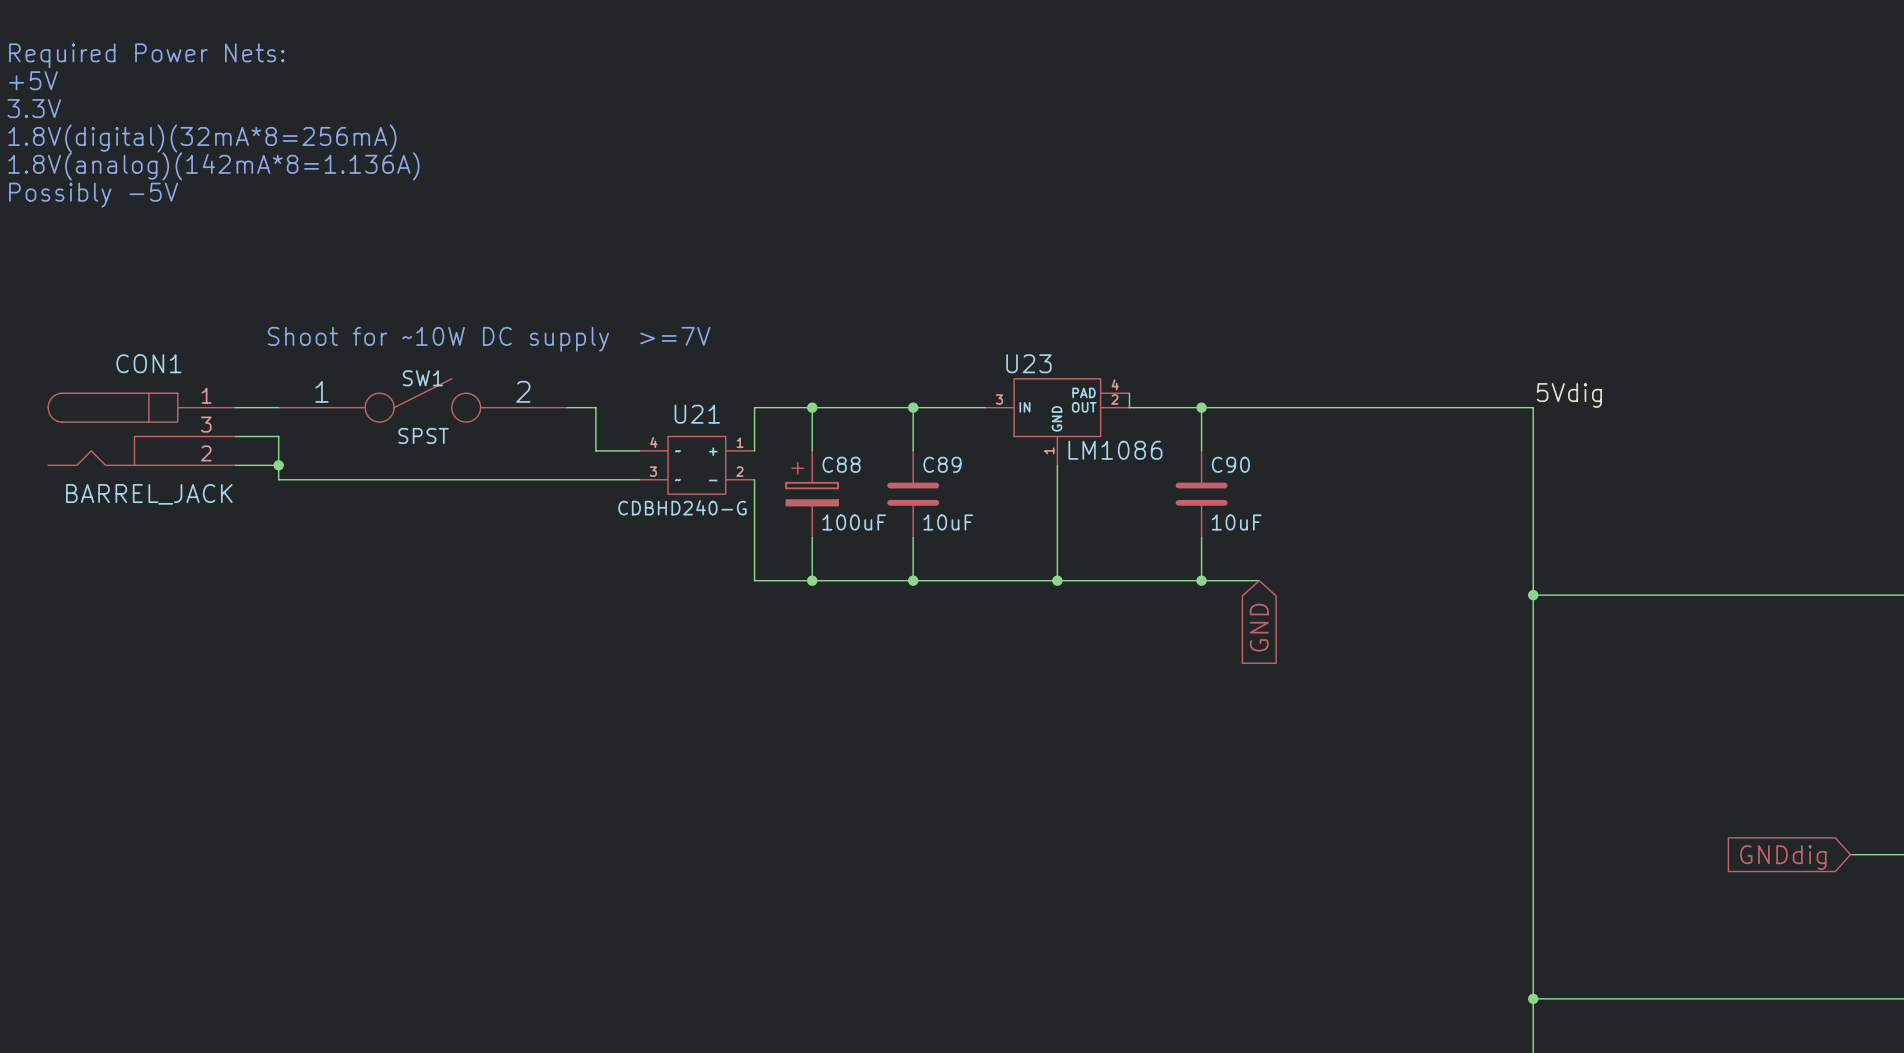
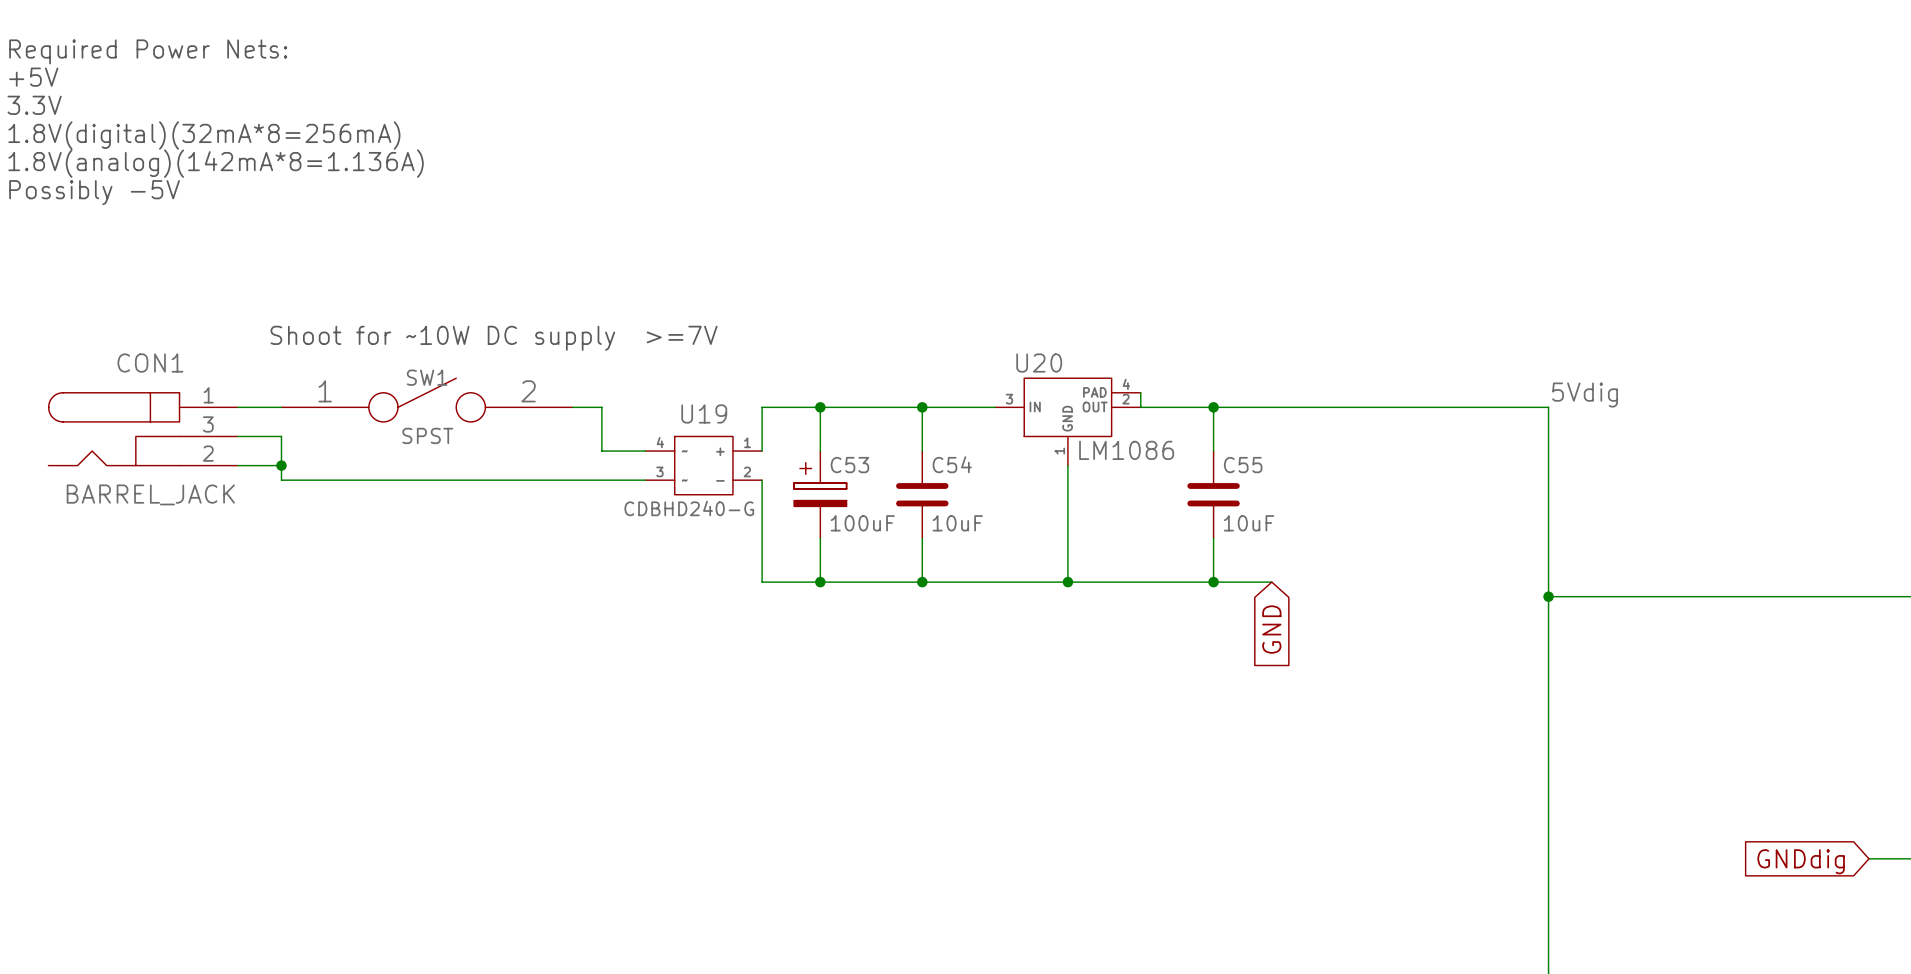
U23 name: U23 (1028, 363) -> U20 (1039, 363)
U21 name: U21 (697, 414) -> U19 (704, 413)
C88 name: C88 (841, 464) -> C53 (849, 465)
C89 name: C89 (942, 464) -> C54 (952, 464)
C90 name: C90 (1230, 464) -> C55 (1243, 465)

